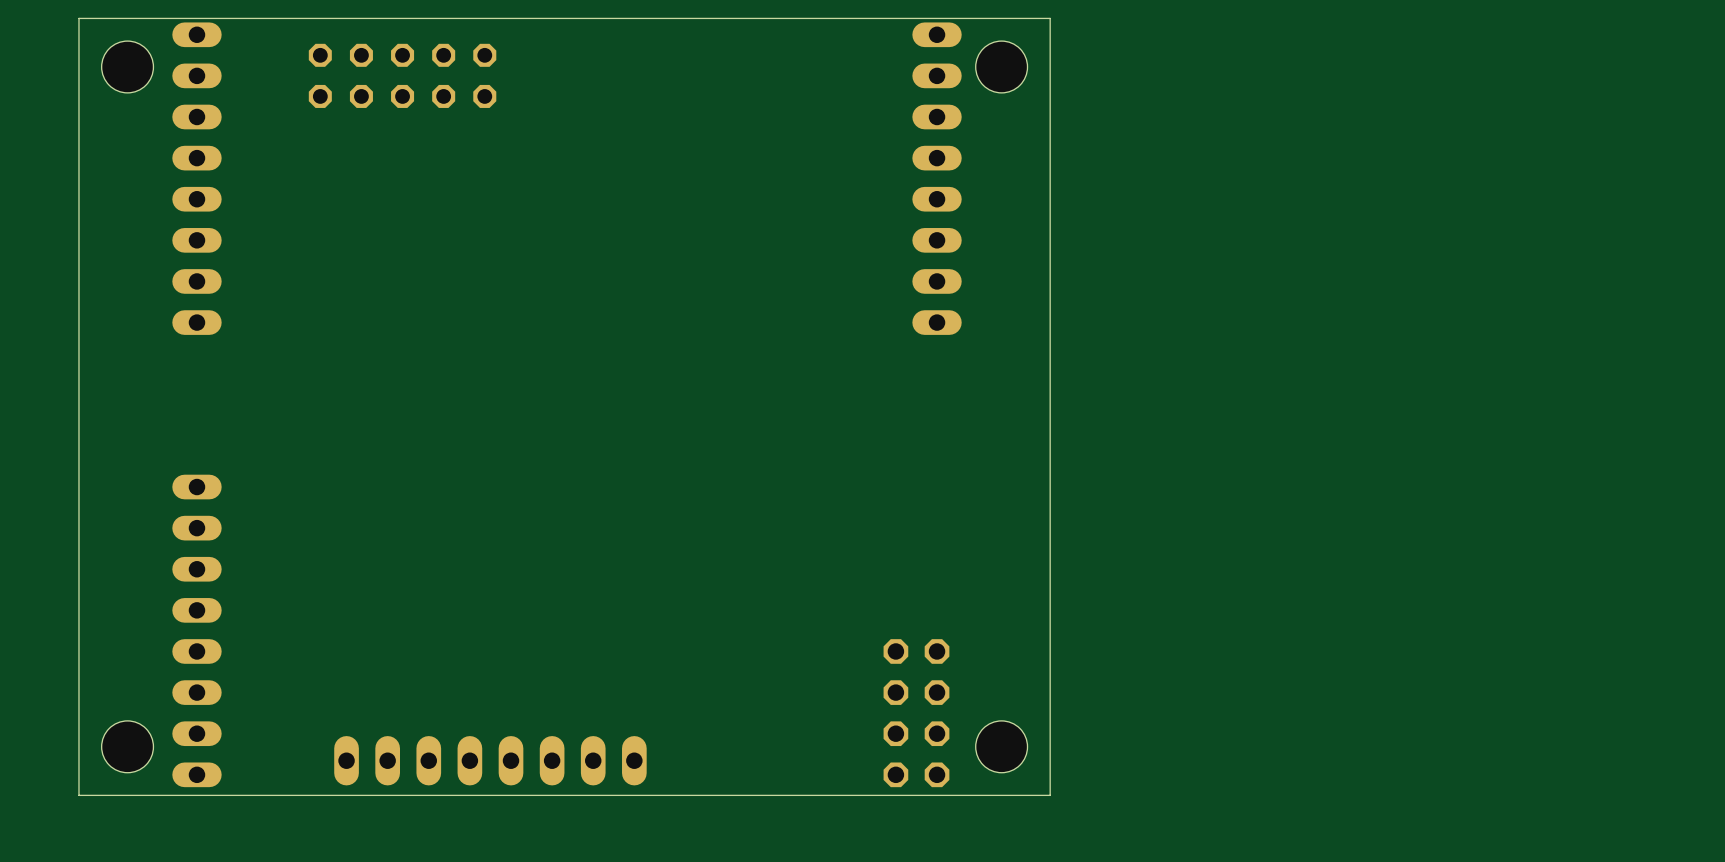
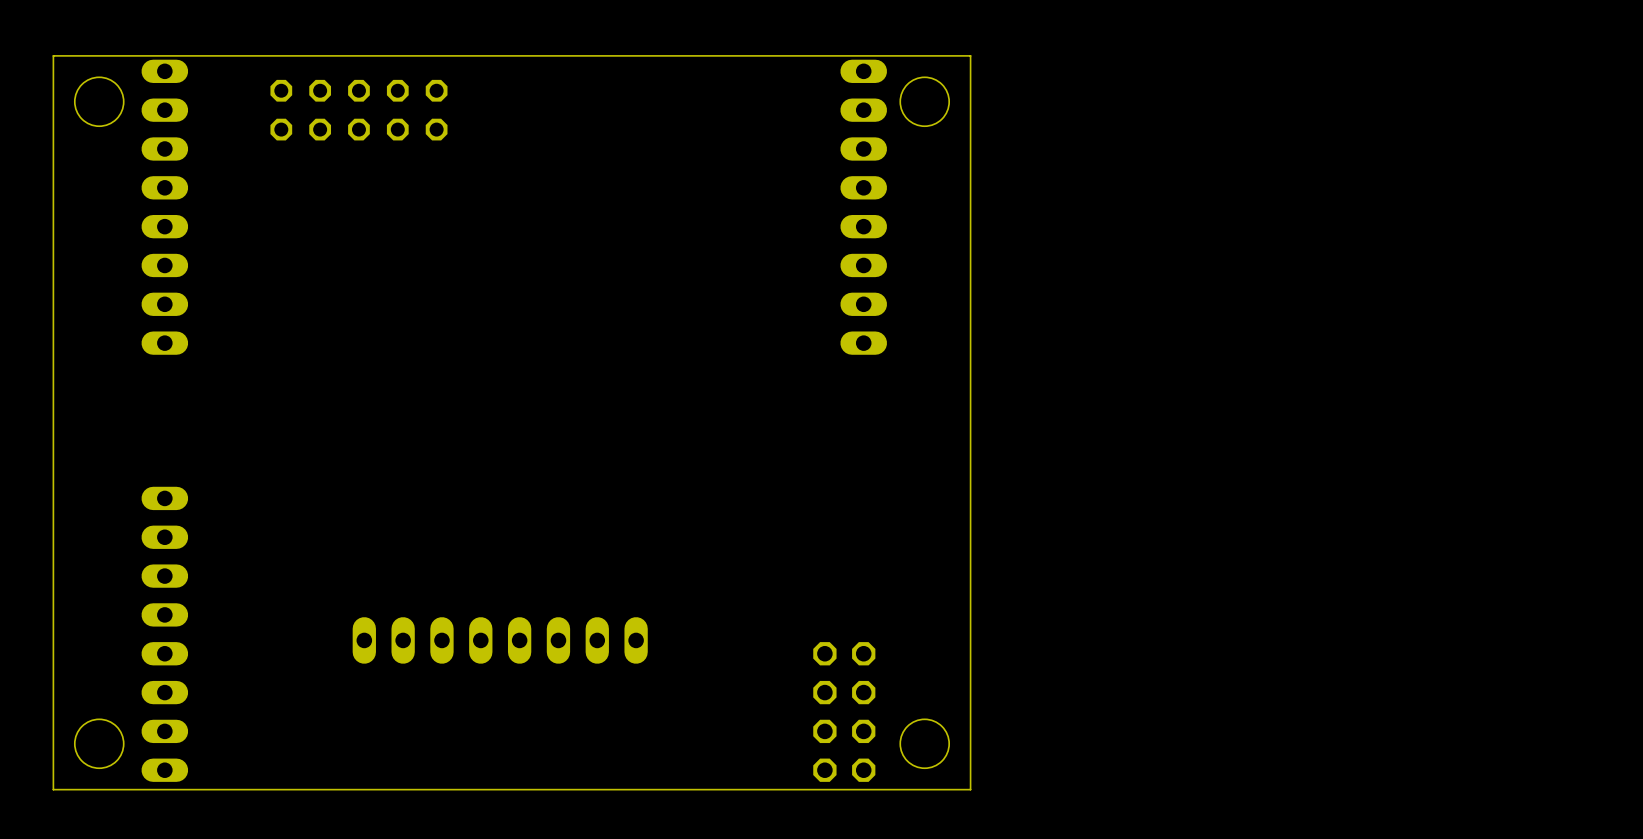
part position: (490, 760) -> (500, 640)

